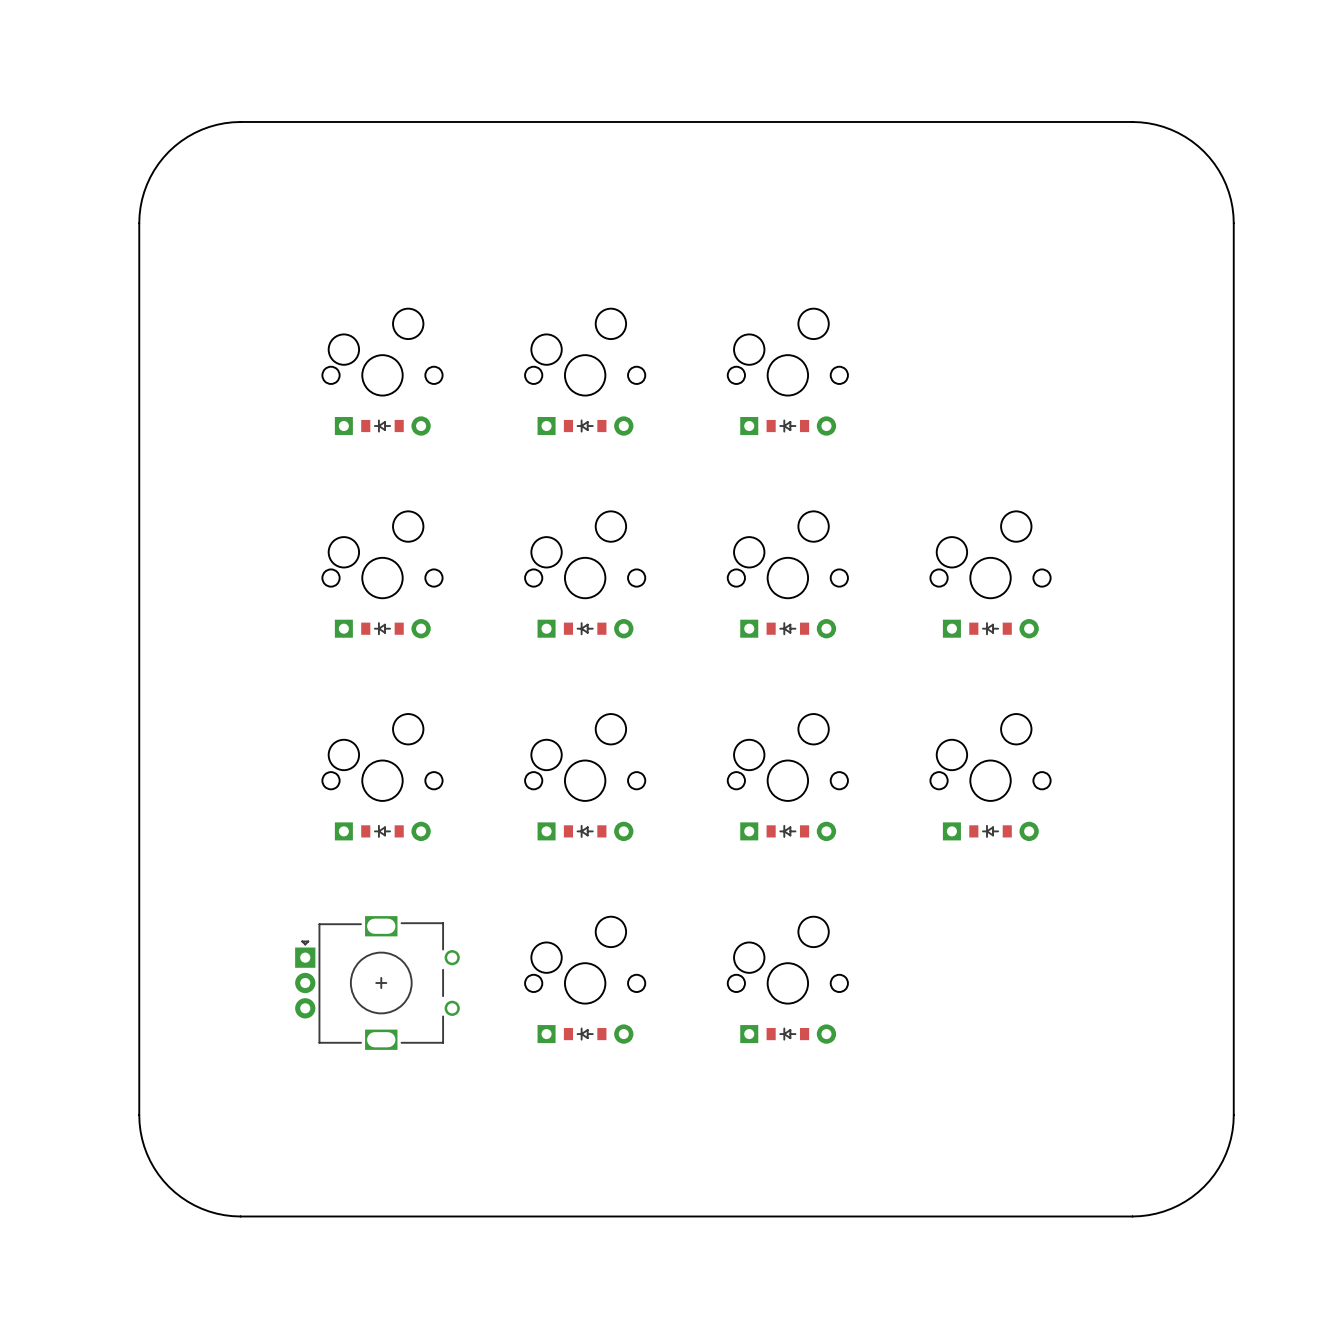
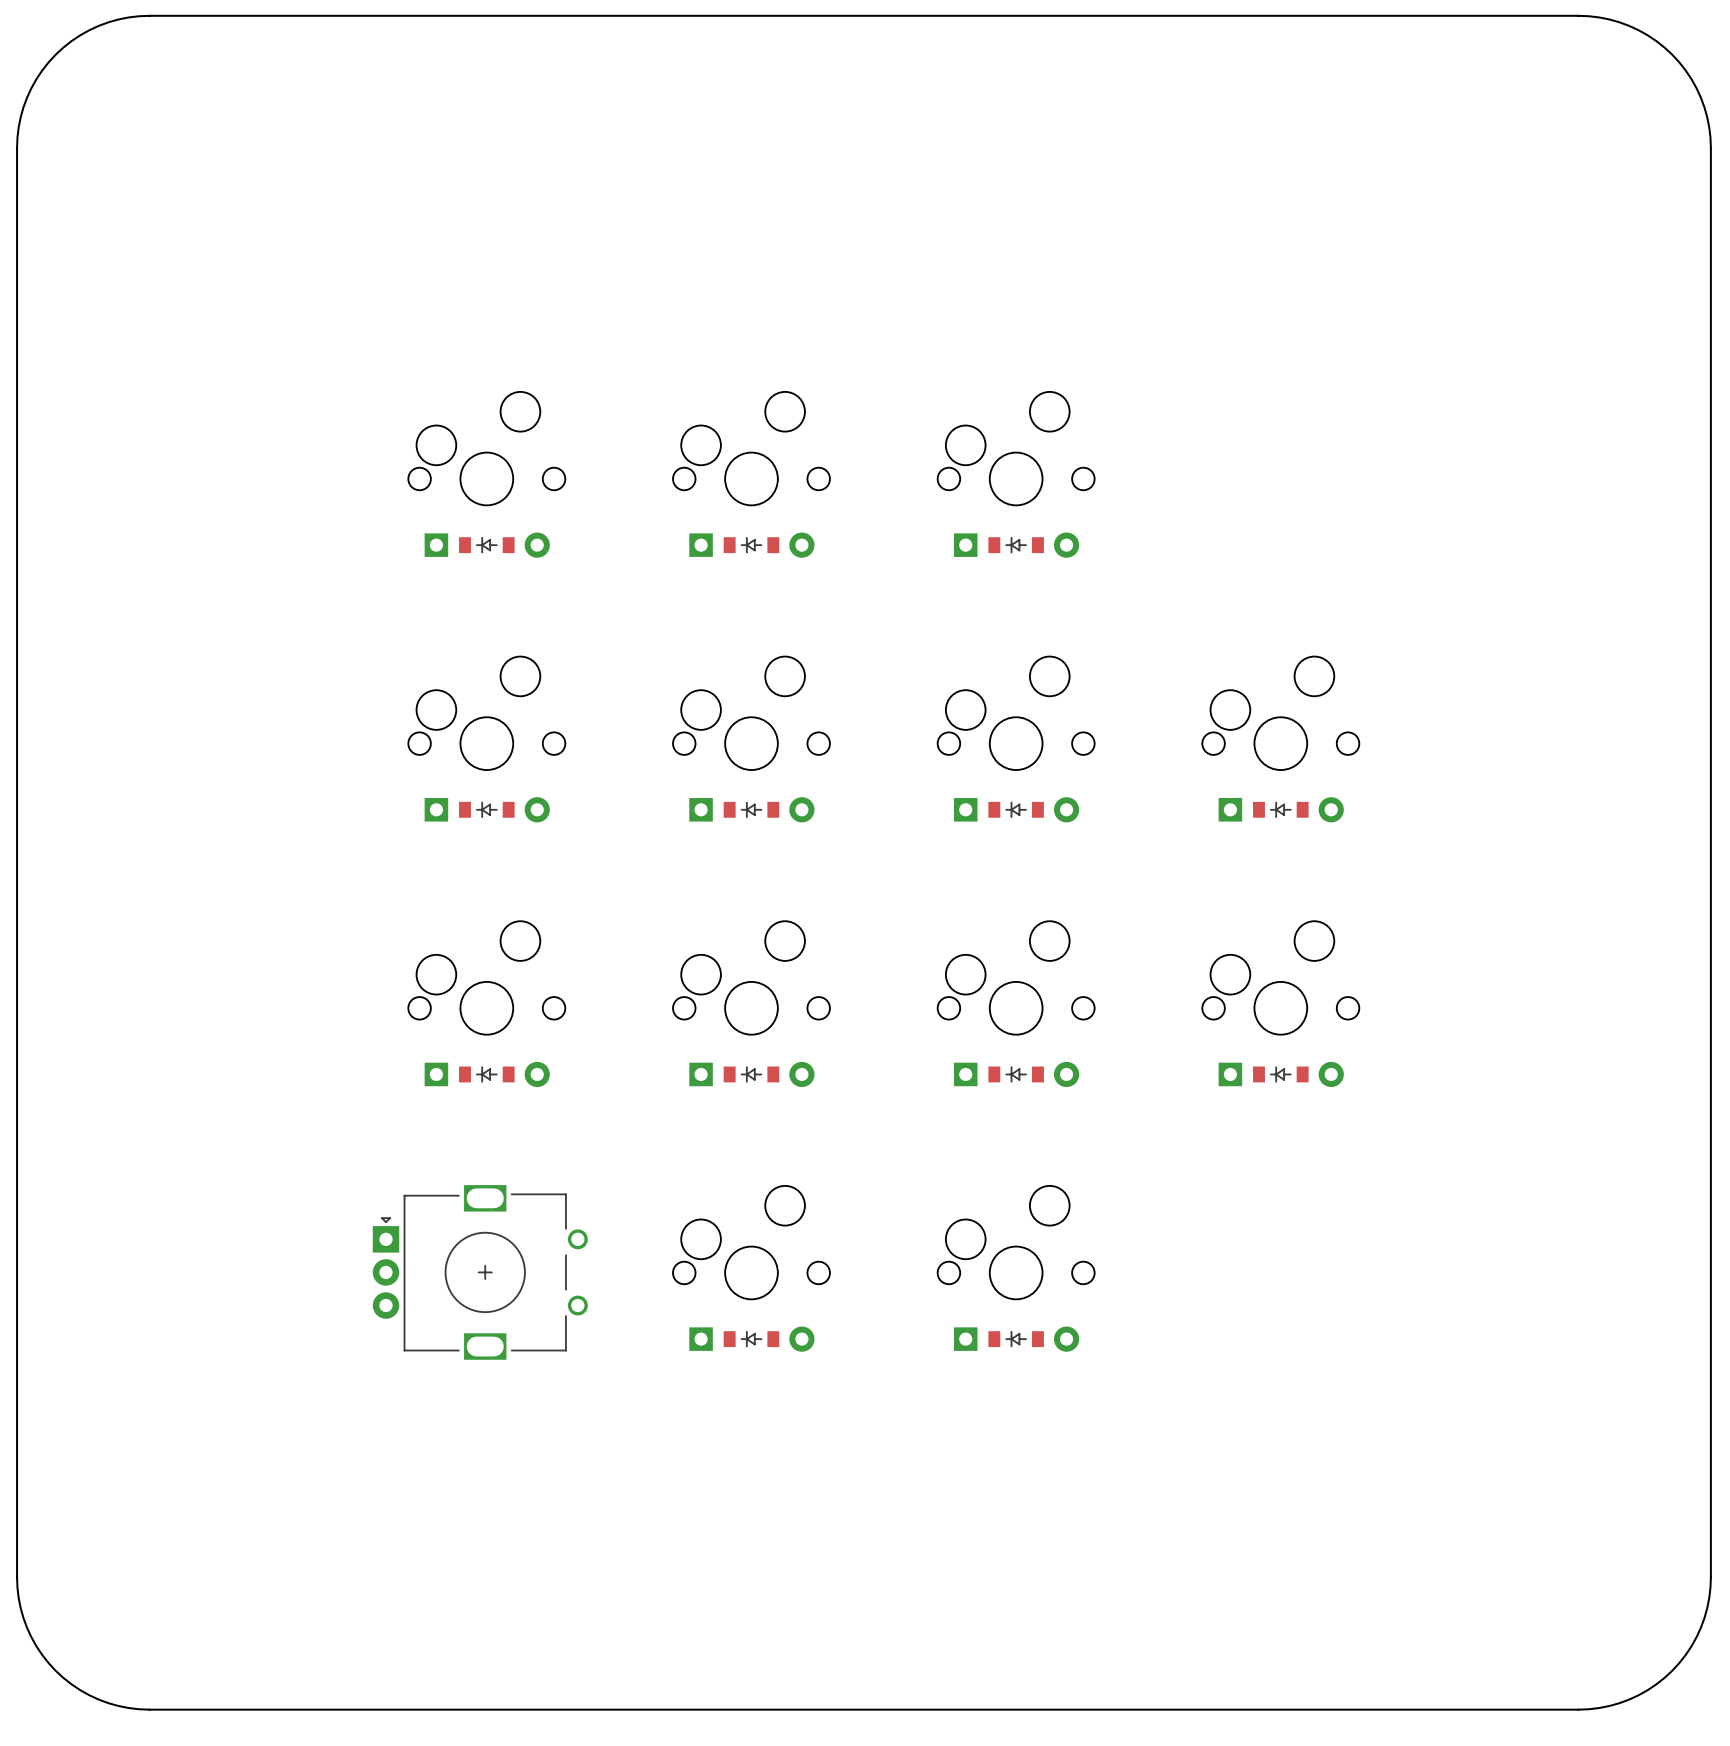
board edge: (240, 121) (1132, 121) (1148, 123) (1171, 129) (1191, 141) (1209, 157) (1222, 177) (1228, 192) (1233, 223) (1233, 1115) (1232, 1130) (1226, 1153) (1214, 1174) (1198, 1192) (1178, 1205) (1163, 1211) (1132, 1216) (240, 1216) (216, 1213) (194, 1205) (174, 1192) (163, 1180) (146, 1153) (140, 1130) (139, 1115) (139, 215) (142, 199) (150, 177) (158, 163) (174, 146) (187, 136) (209, 126) (240, 121) -> (149, 15) (128, 17) (108, 22) (89, 30) (63, 47) (48, 62) (31, 88) (20, 117) (17, 137) (17, 1577) (18, 1598) (23, 1618) (31, 1637) (48, 1663) (63, 1677) (89, 1695) (118, 1706) (149, 1709) (1578, 1709) (1599, 1708) (1619, 1703) (1638, 1695) (1664, 1677) (1685, 1655) (1700, 1627) (1709, 1598) (1710, 1577) (1710, 148) (1709, 127) (1700, 97) (1691, 79) (1679, 62) (1664, 47) (1638, 30) (1609, 19) (1578, 15) (149, 15)

